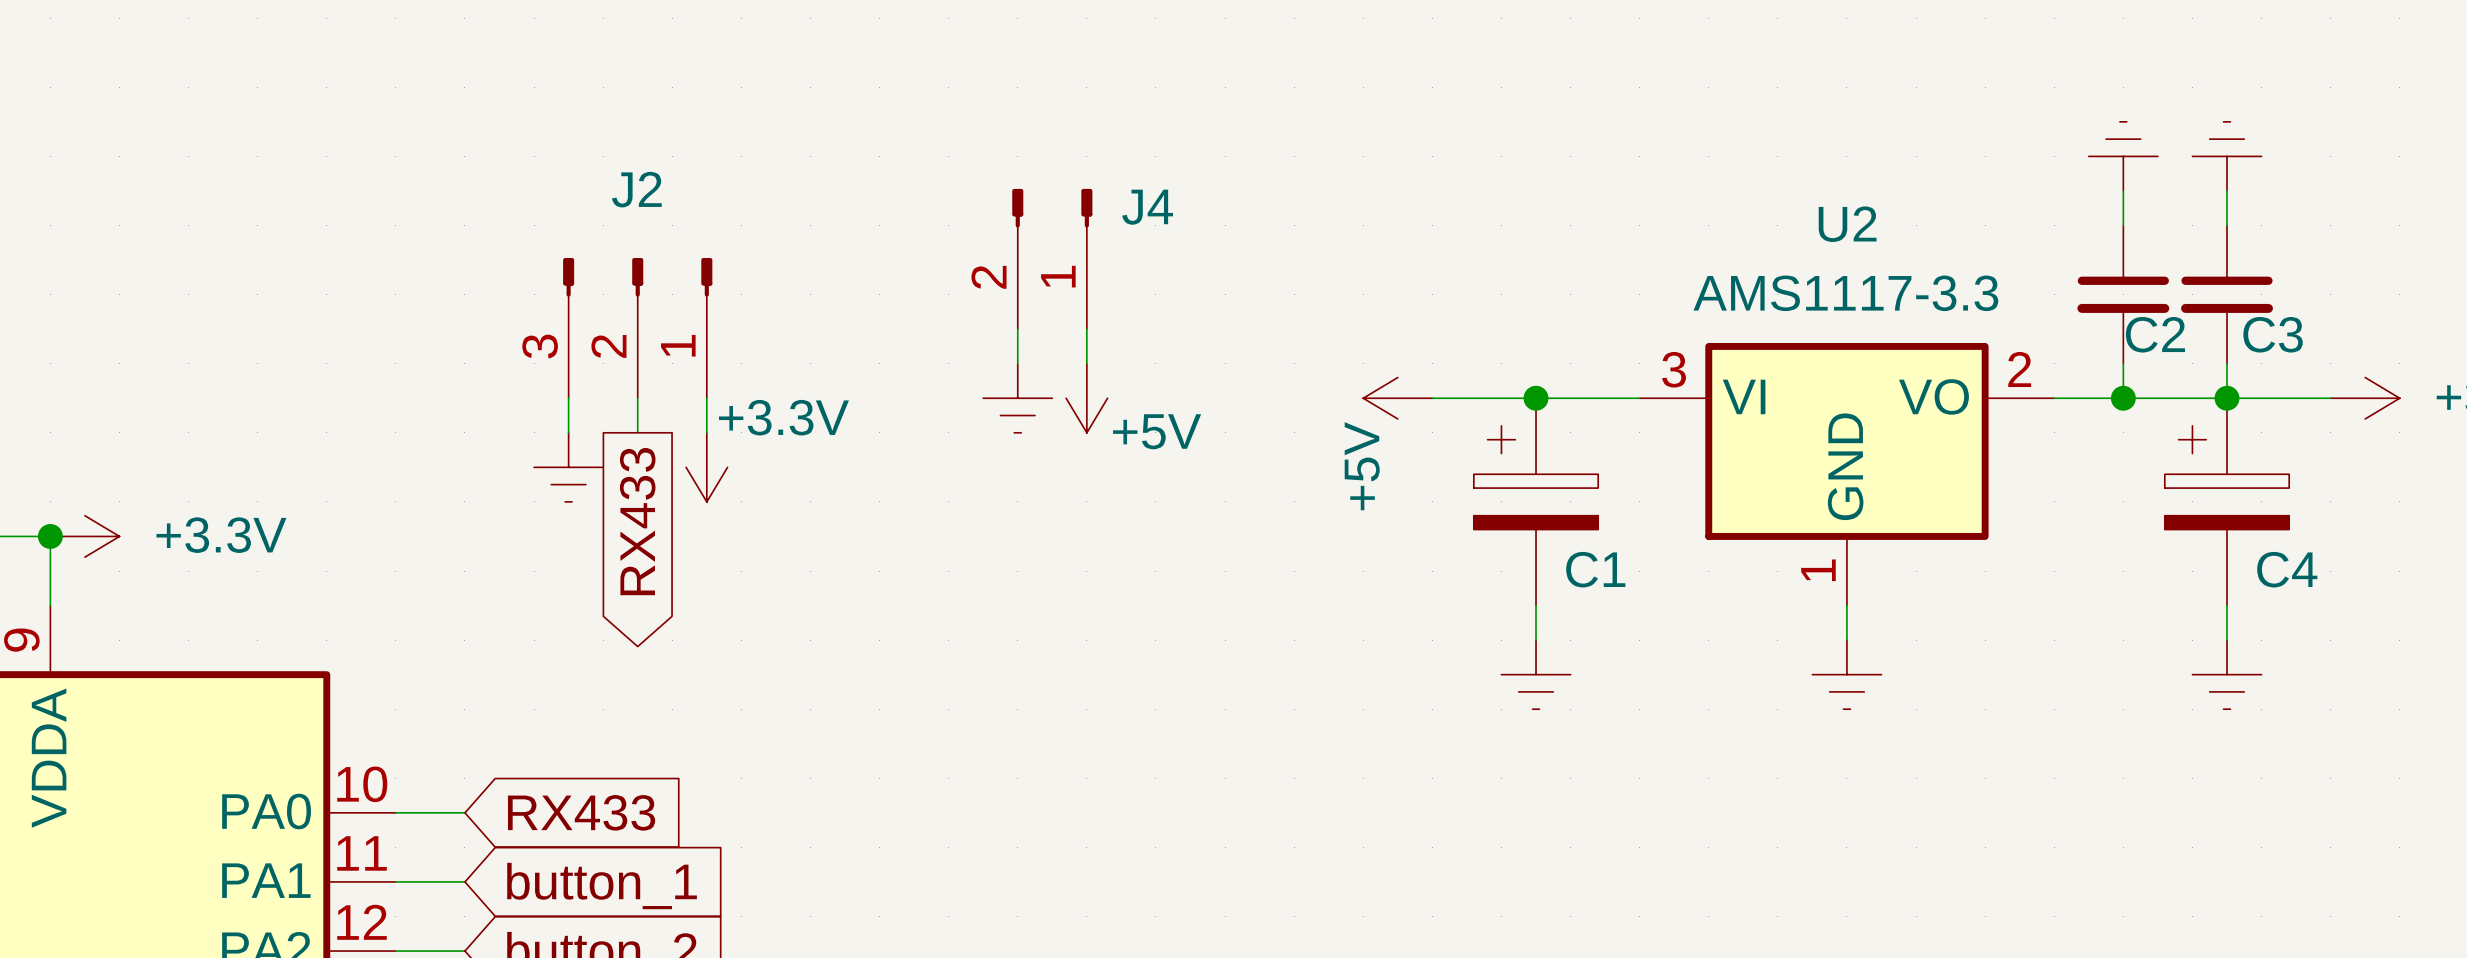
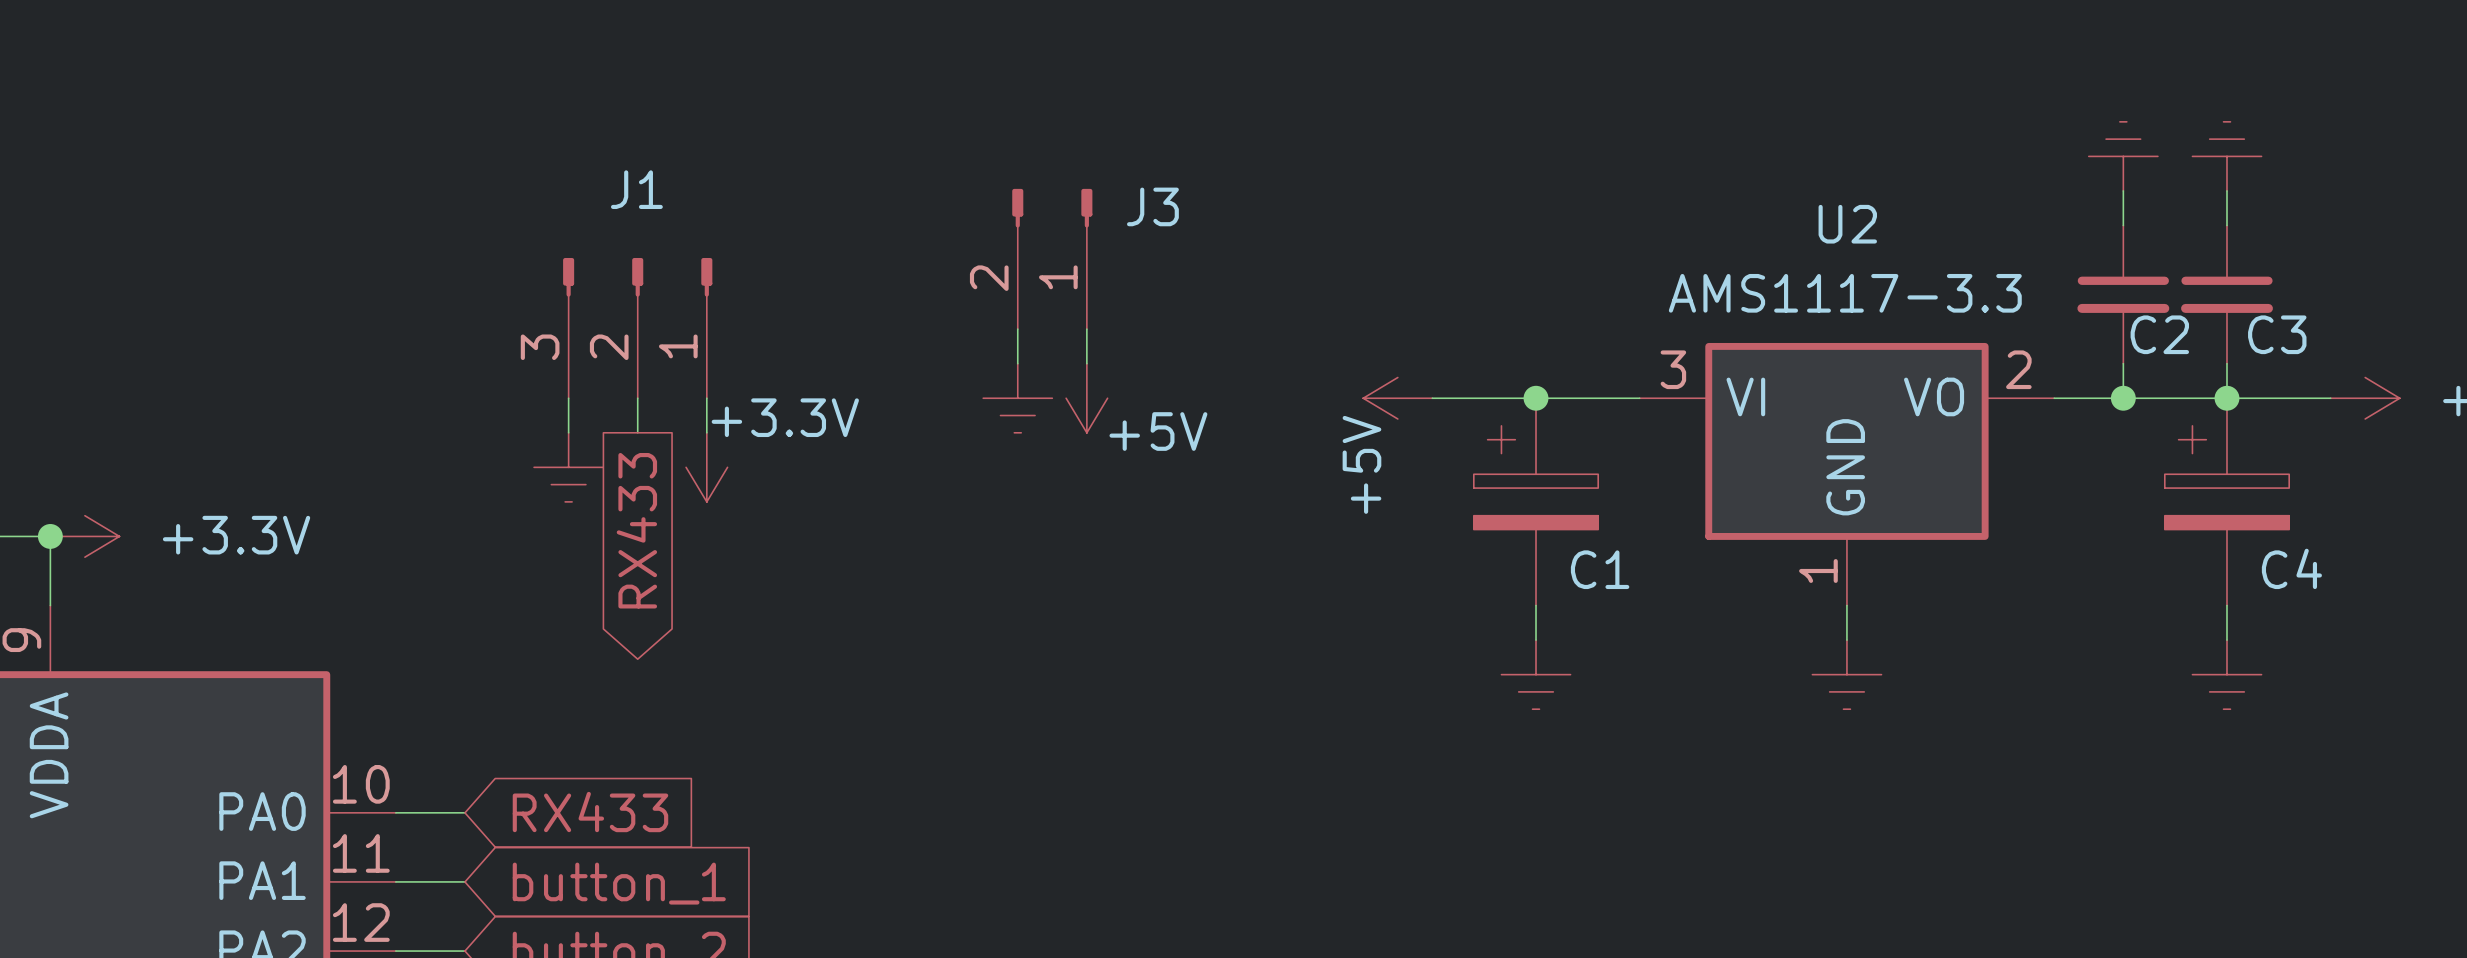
J2 name: J2 (636, 189) -> J1 (636, 189)
J4 name: J4 (1147, 207) -> J3 (1152, 206)

